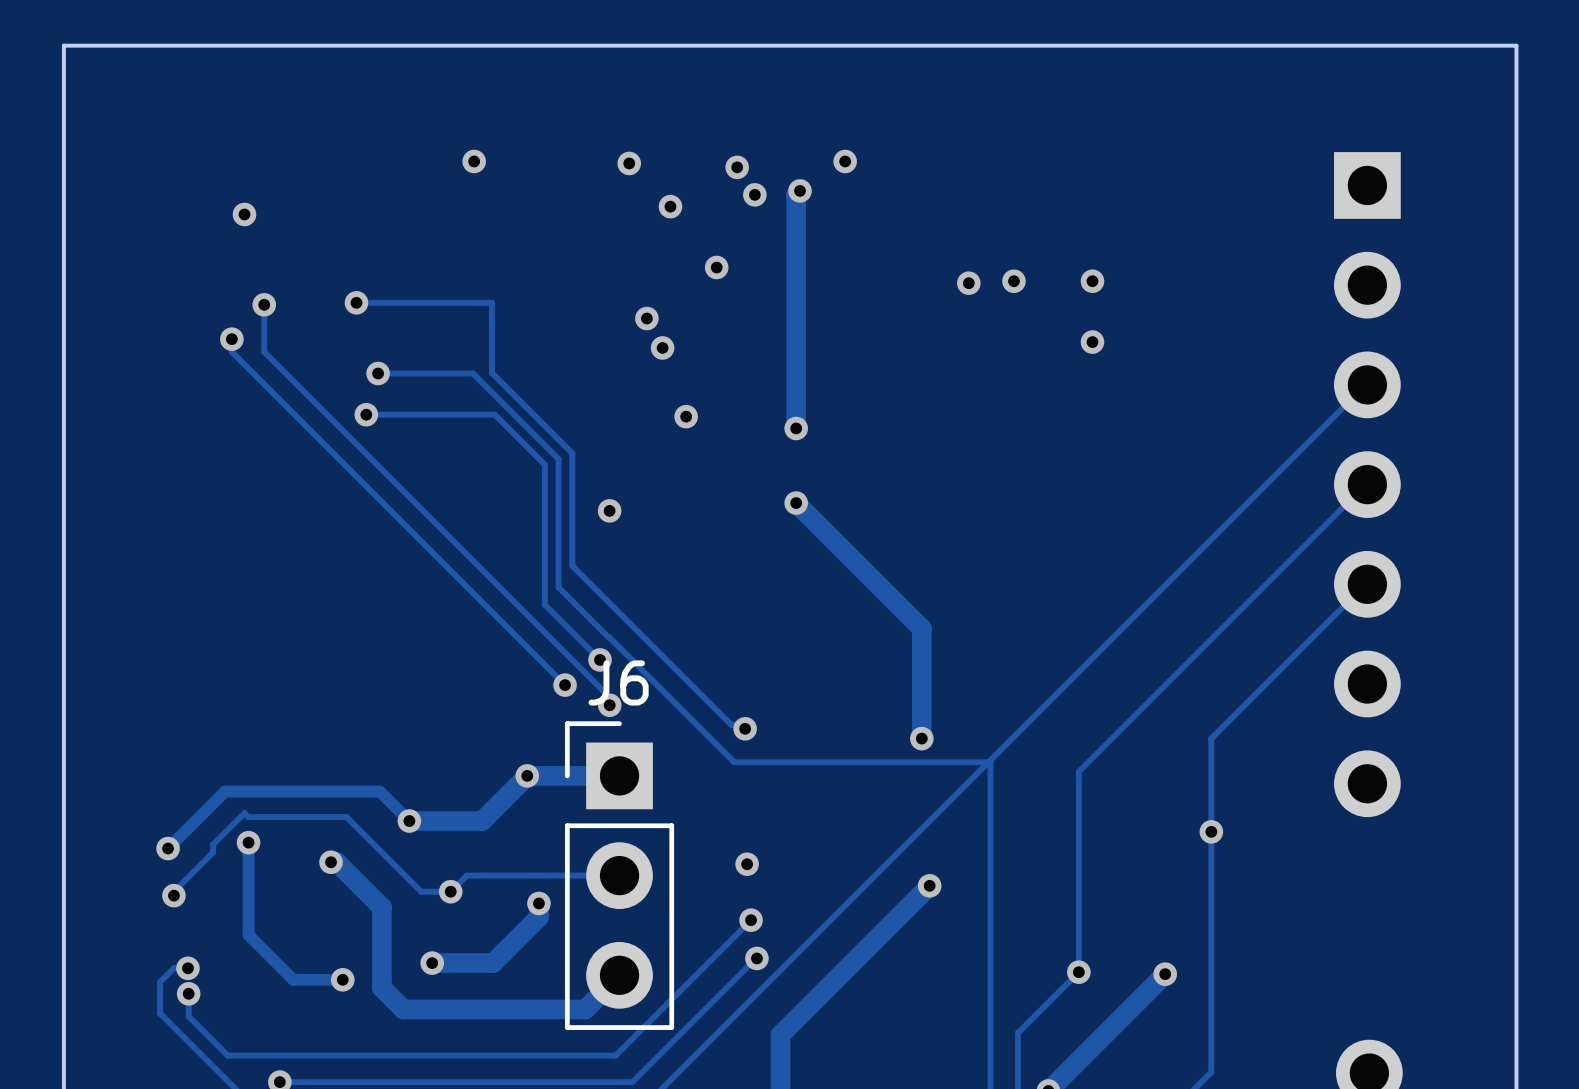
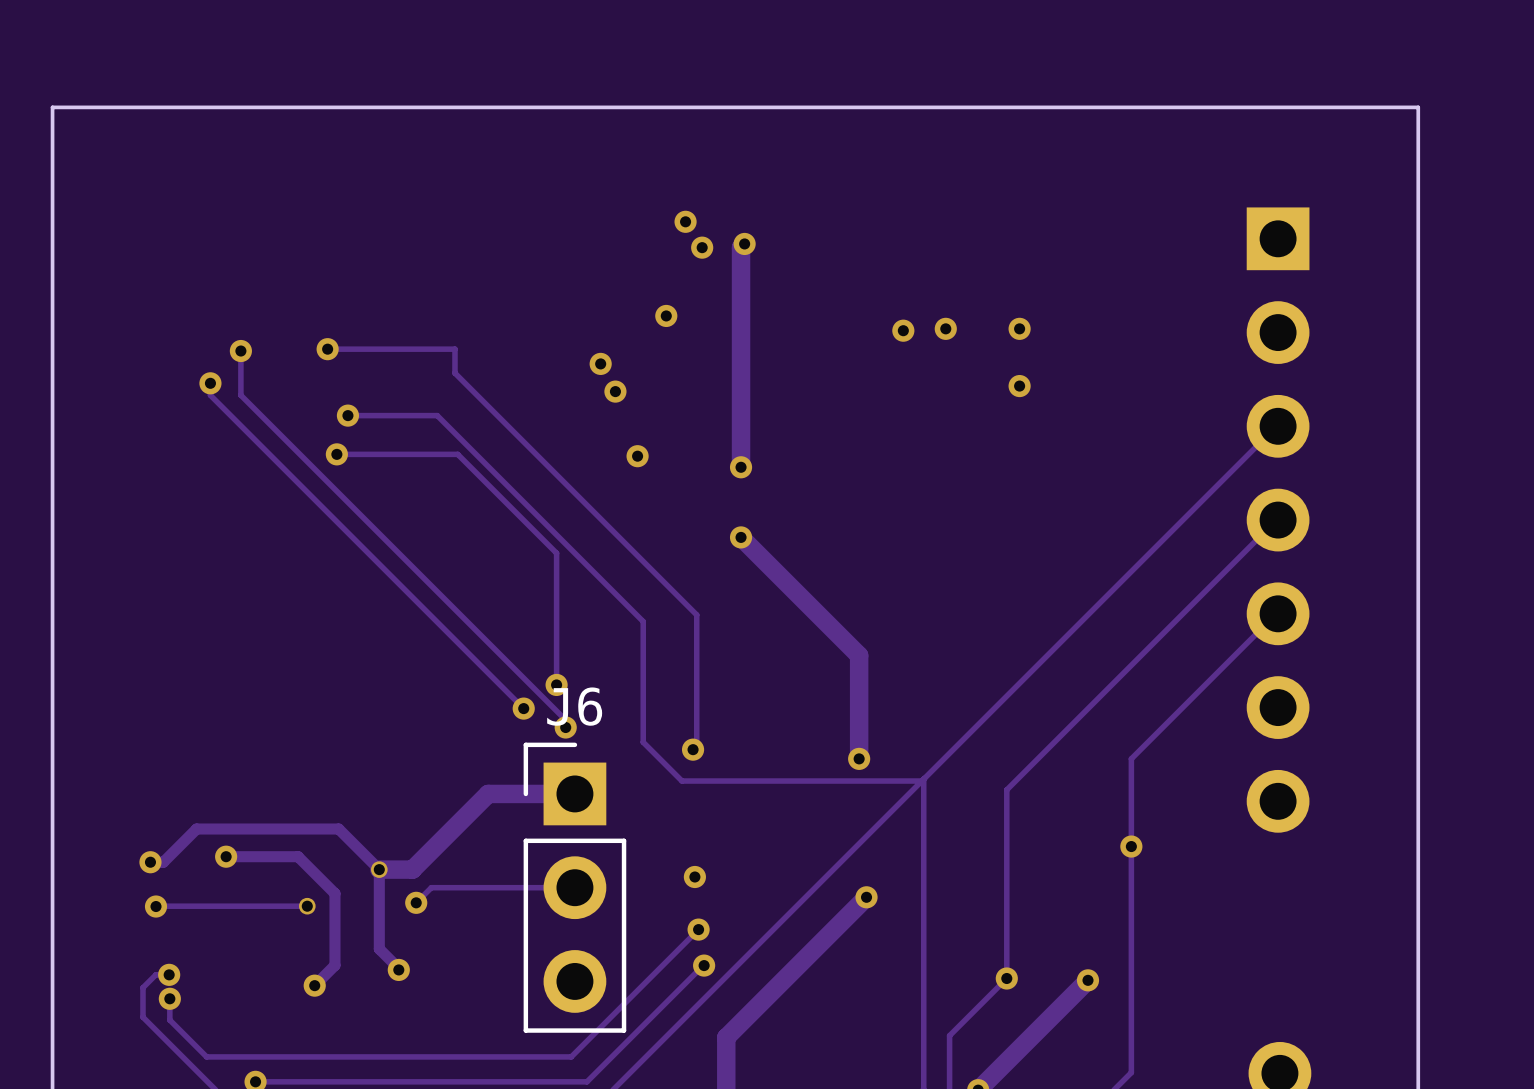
via: (474, 161) -> none
via: (845, 161) -> none
via: (629, 163) -> none
via: (670, 206) -> none
via: (244, 214) -> none
track: (491, 328) (491, 372) (572, 453) (572, 565) (731, 724) (749, 724) -> (454, 373) (696, 614) (696, 745)
track: (558, 458) (558, 587) (608, 637) -> (517, 495) (643, 621) (643, 742) (681, 781)
track: (544, 464) (544, 604) (600, 659) -> (504, 501) (556, 553) (556, 684)
via: (609, 510) -> none
track: (609, 637) (734, 762) -> none
via: (527, 775) -> none
via: (409, 821) -> none
track: (482, 821) (409, 821) (379, 791) (225, 791) (168, 848) -> (379, 869) (338, 829) (196, 829) (163, 862) (150, 862)
track: none -> (445, 836) (412, 869) (379, 869)
track: (248, 842) (248, 934) (293, 979) (342, 979) -> (226, 856) (298, 856) (334, 893) (334, 965) (314, 985)
track: none -> (379, 869) (379, 948) (398, 968)
via: none -> (379, 869)
track: (331, 862) (336, 862) (381, 907) (381, 987) (403, 1009) (585, 1009) (619, 975) -> none
via: (331, 862) -> none
track: (450, 891) (421, 891) (346, 817) (248, 817) (244, 813) (213, 844) (213, 852) (173, 891) (173, 895) -> (307, 906) (156, 906)
via: none -> (307, 906)
track: (538, 903) (538, 917) (493, 963) (432, 963) -> none
via: (538, 903) -> none

